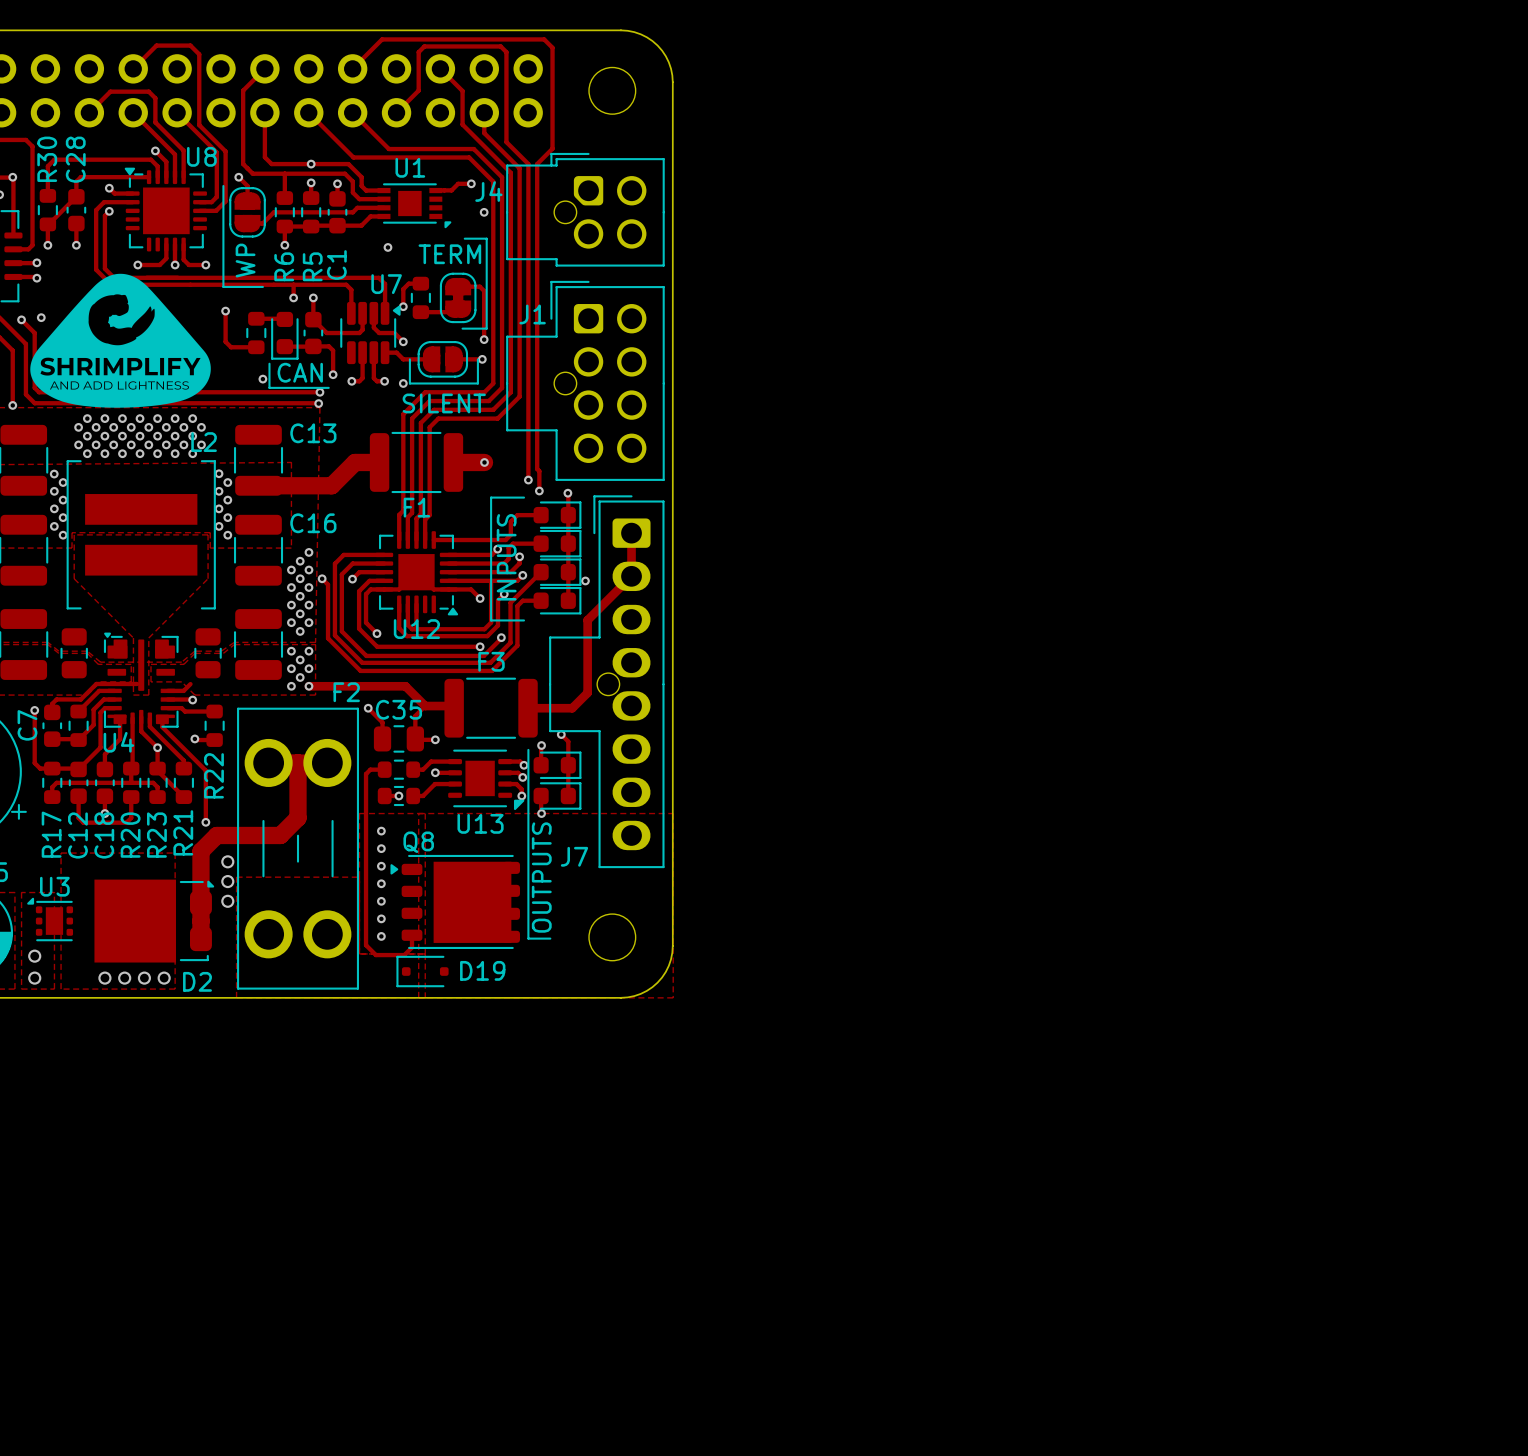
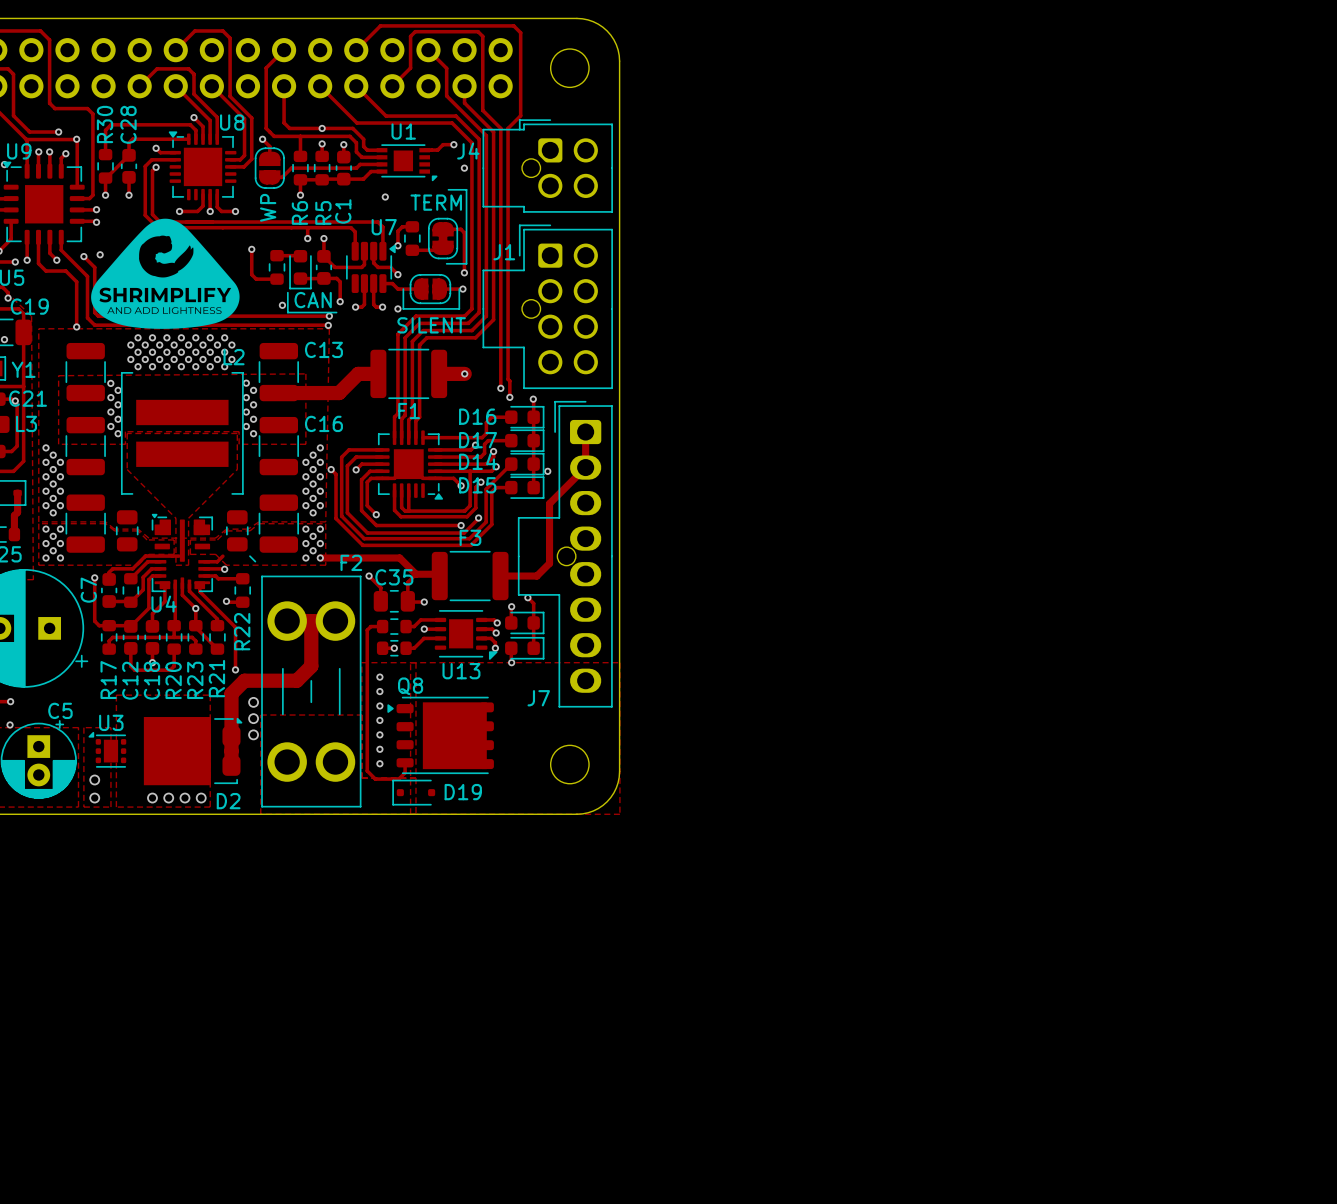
line: (223, 186) (223, 286) (262, 286) -> none
line: (524, 497) (491, 497) (491, 620) (524, 620) -> none
D16 name: none -> D16 (477, 416)
D17 name: none -> D17 (478, 440)
text: INPUTS (506, 557) -> none
D14 name: none -> D14 (478, 461)
D15 name: none -> D15 (477, 485)
U12 name: U12 (416, 629) -> none
line: none -> (249, 556) (255, 561)
line: (528, 749) (528, 938) (550, 938) -> none
text: OUTPUTS (541, 877) -> none

